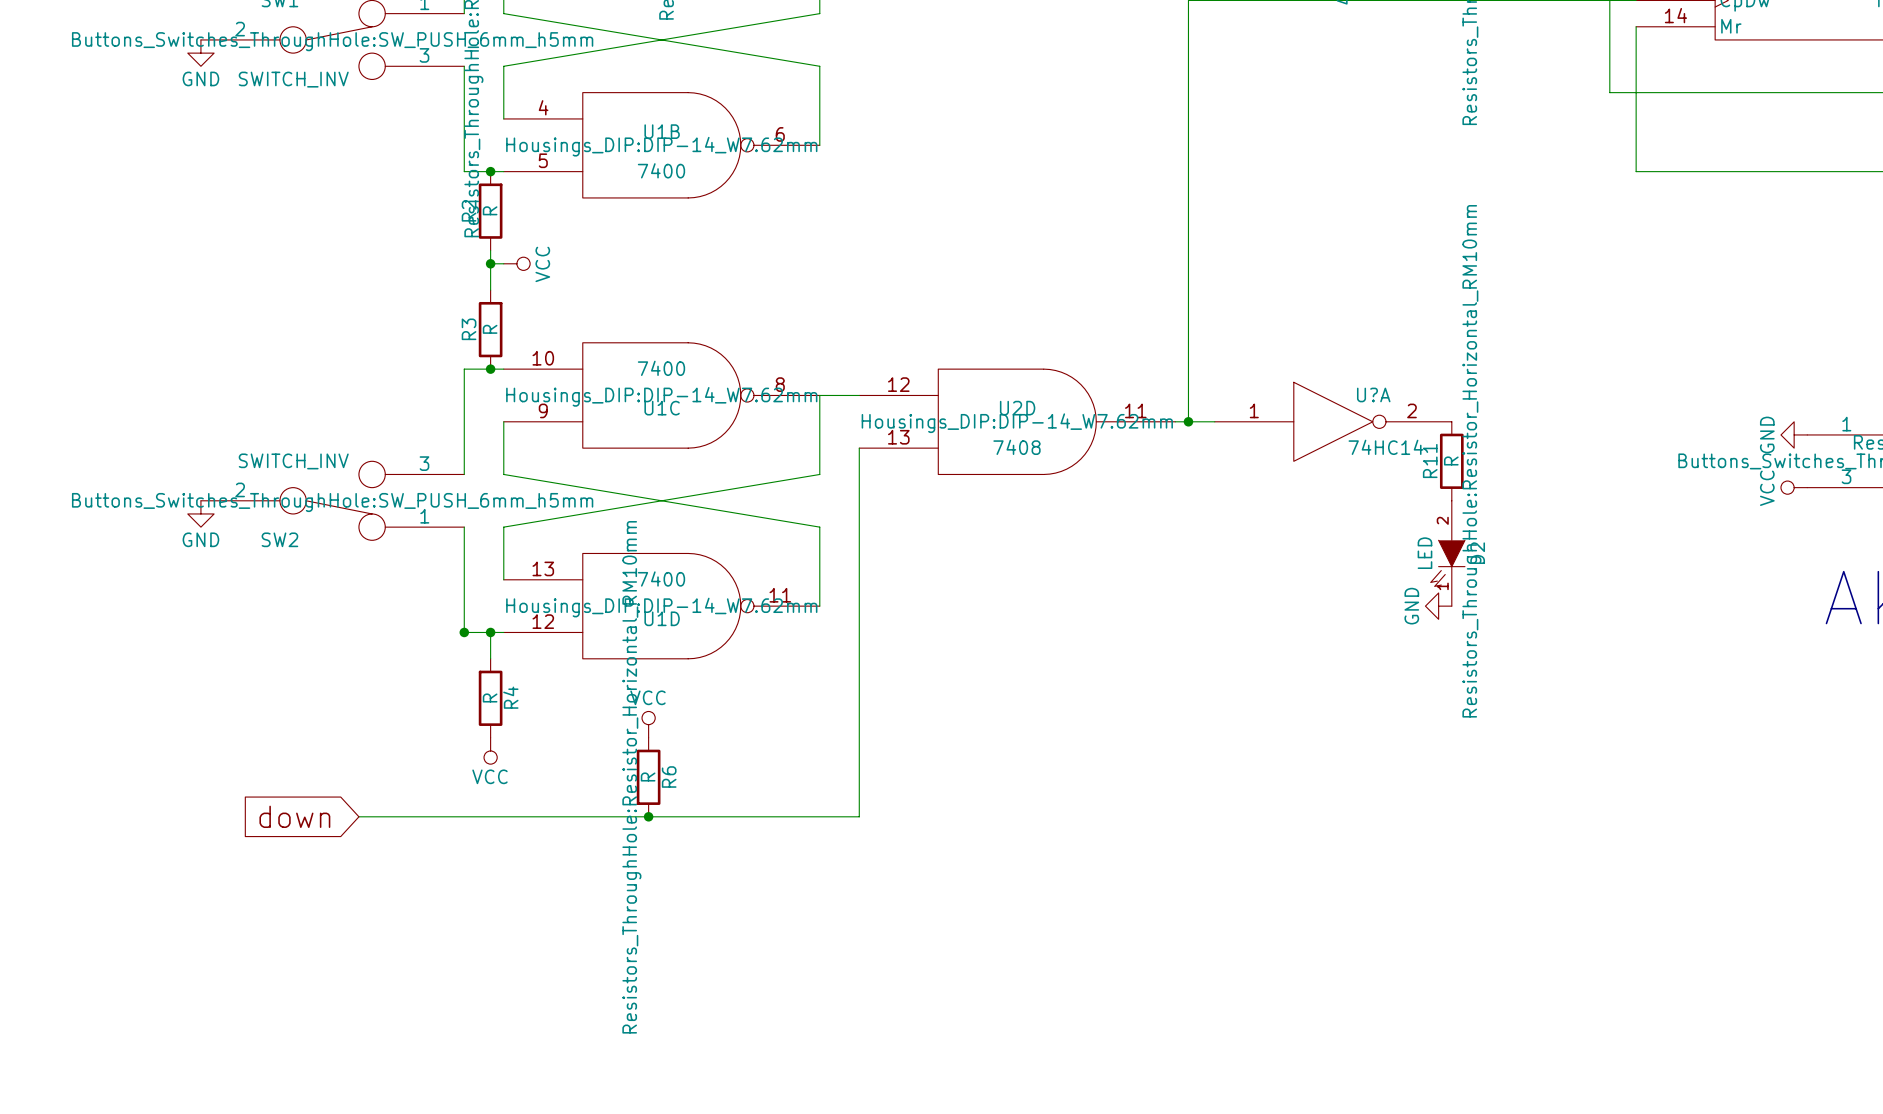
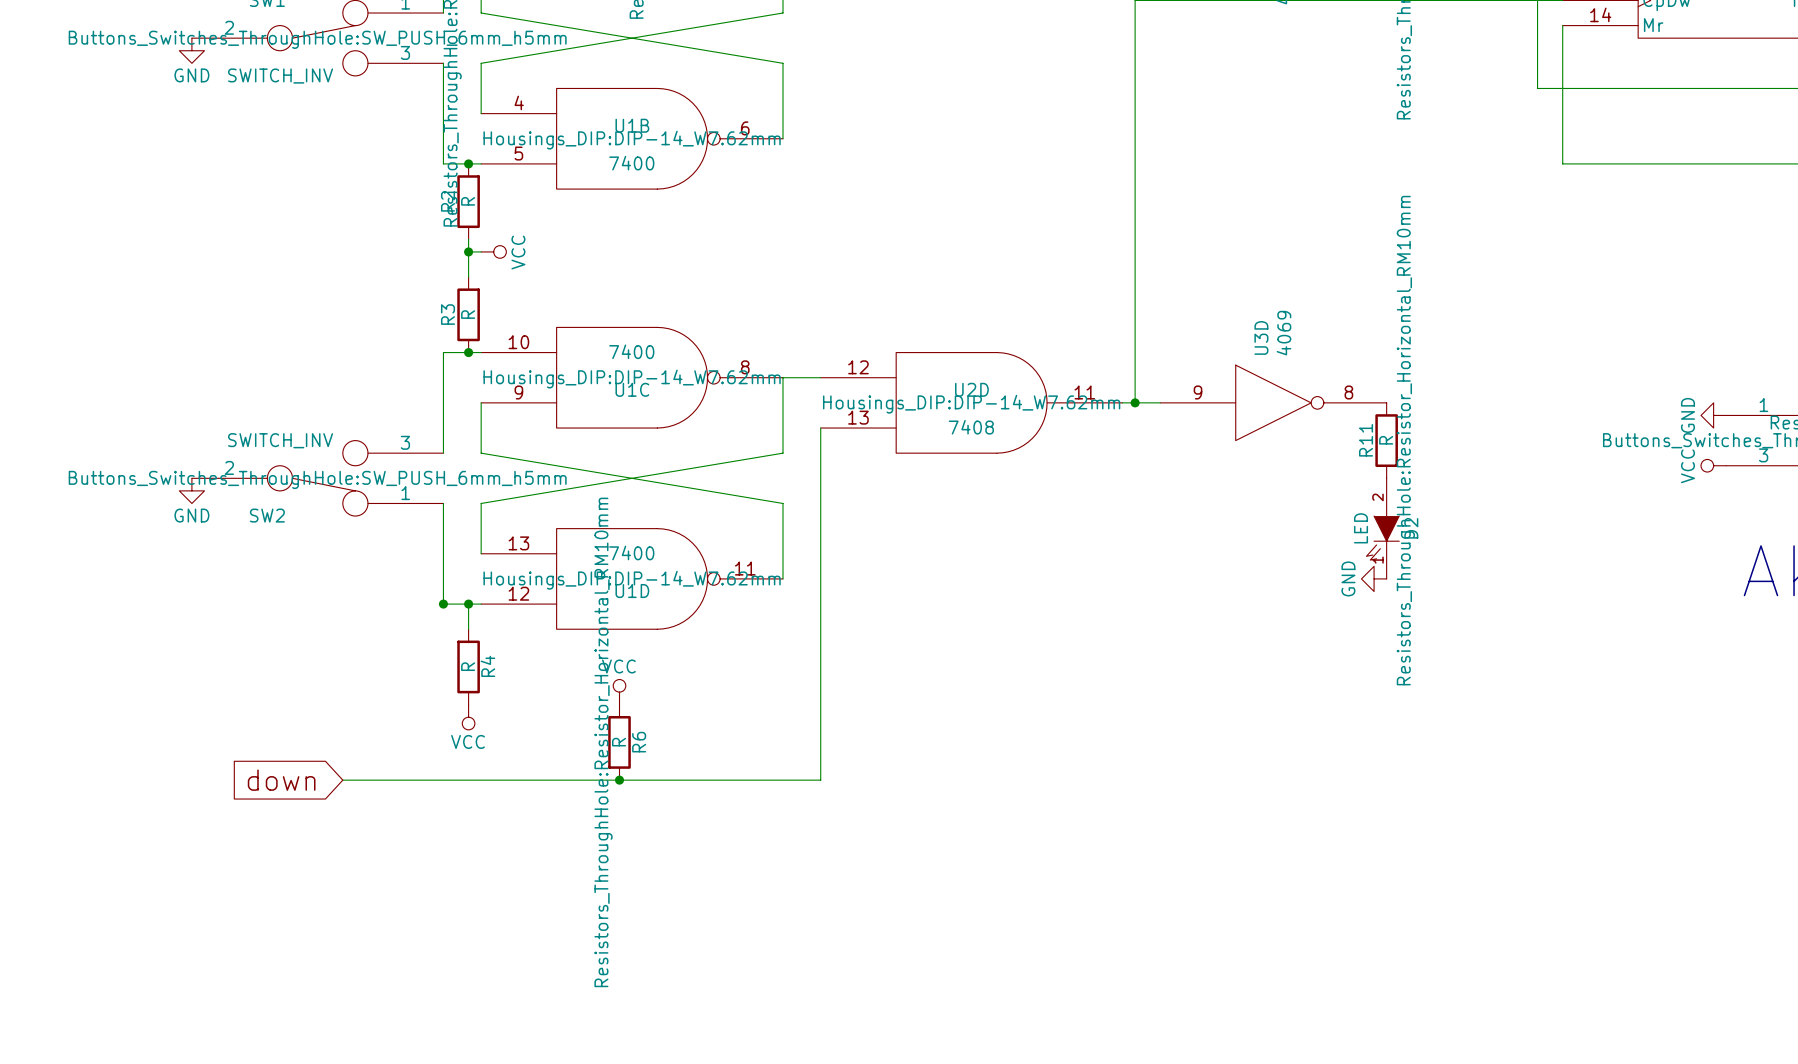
U?A name: U?A (1373, 394) -> U3D (1261, 337)
U?A pin number: 1 (1254, 410) -> 9 (1198, 392)
U?A pin number: 2 (1411, 410) -> 8 (1348, 392)
U?A value: 74HC14 (1385, 447) -> 4069 (1284, 333)

